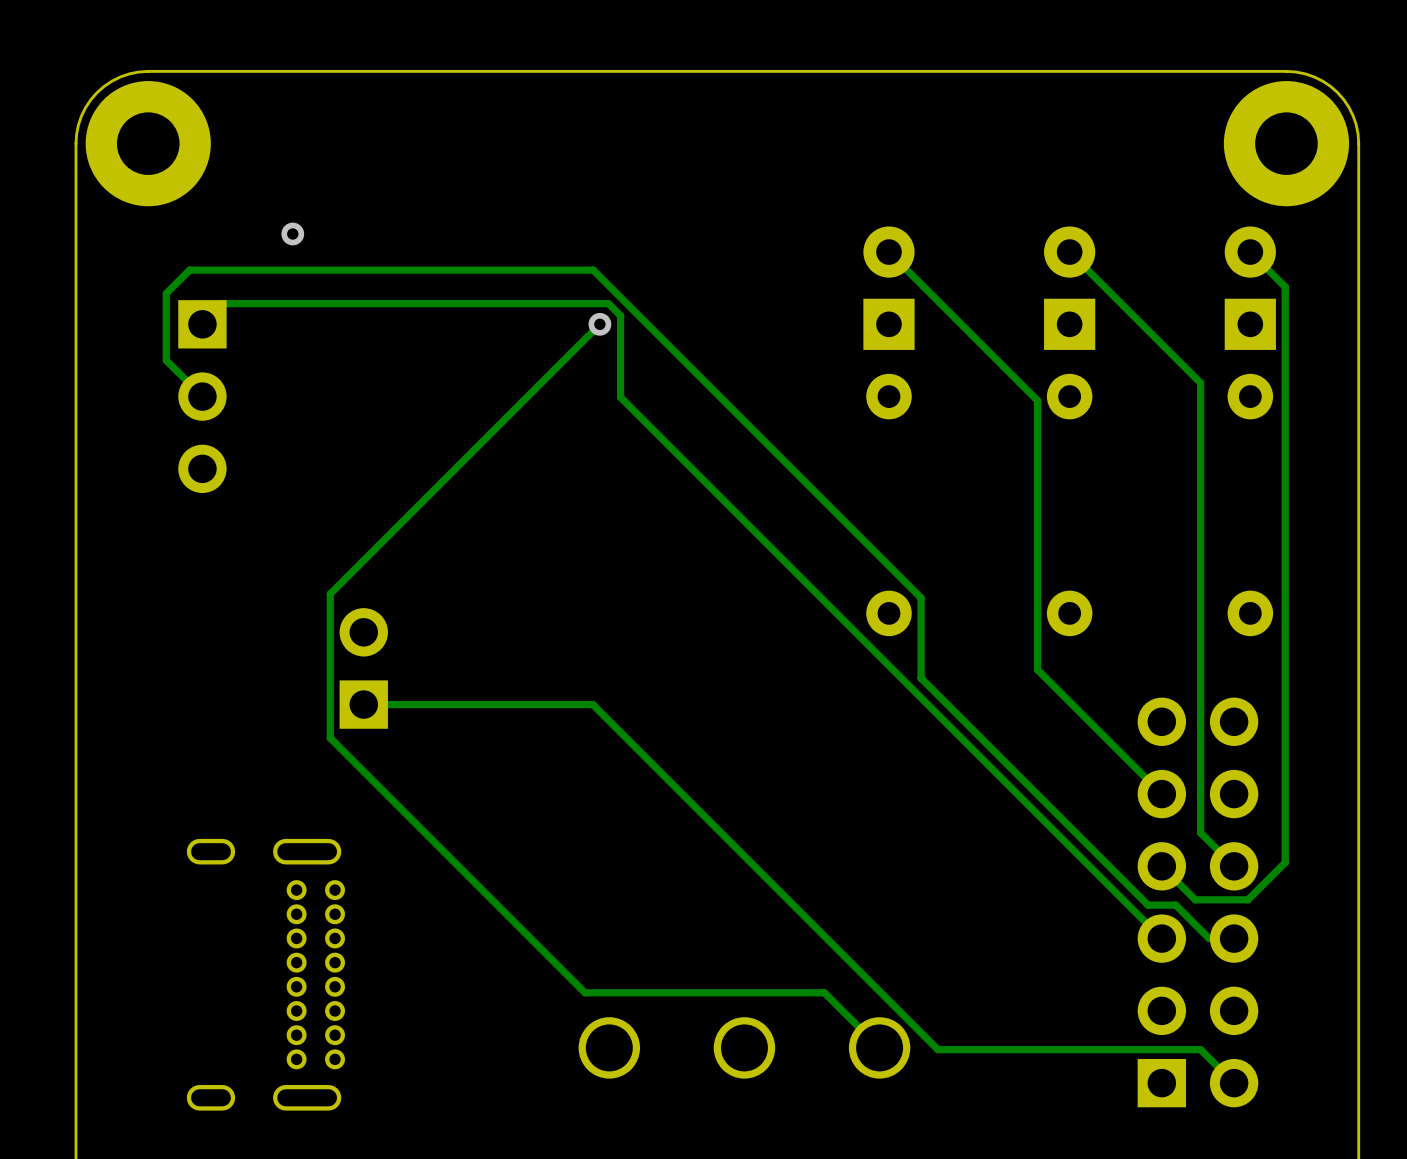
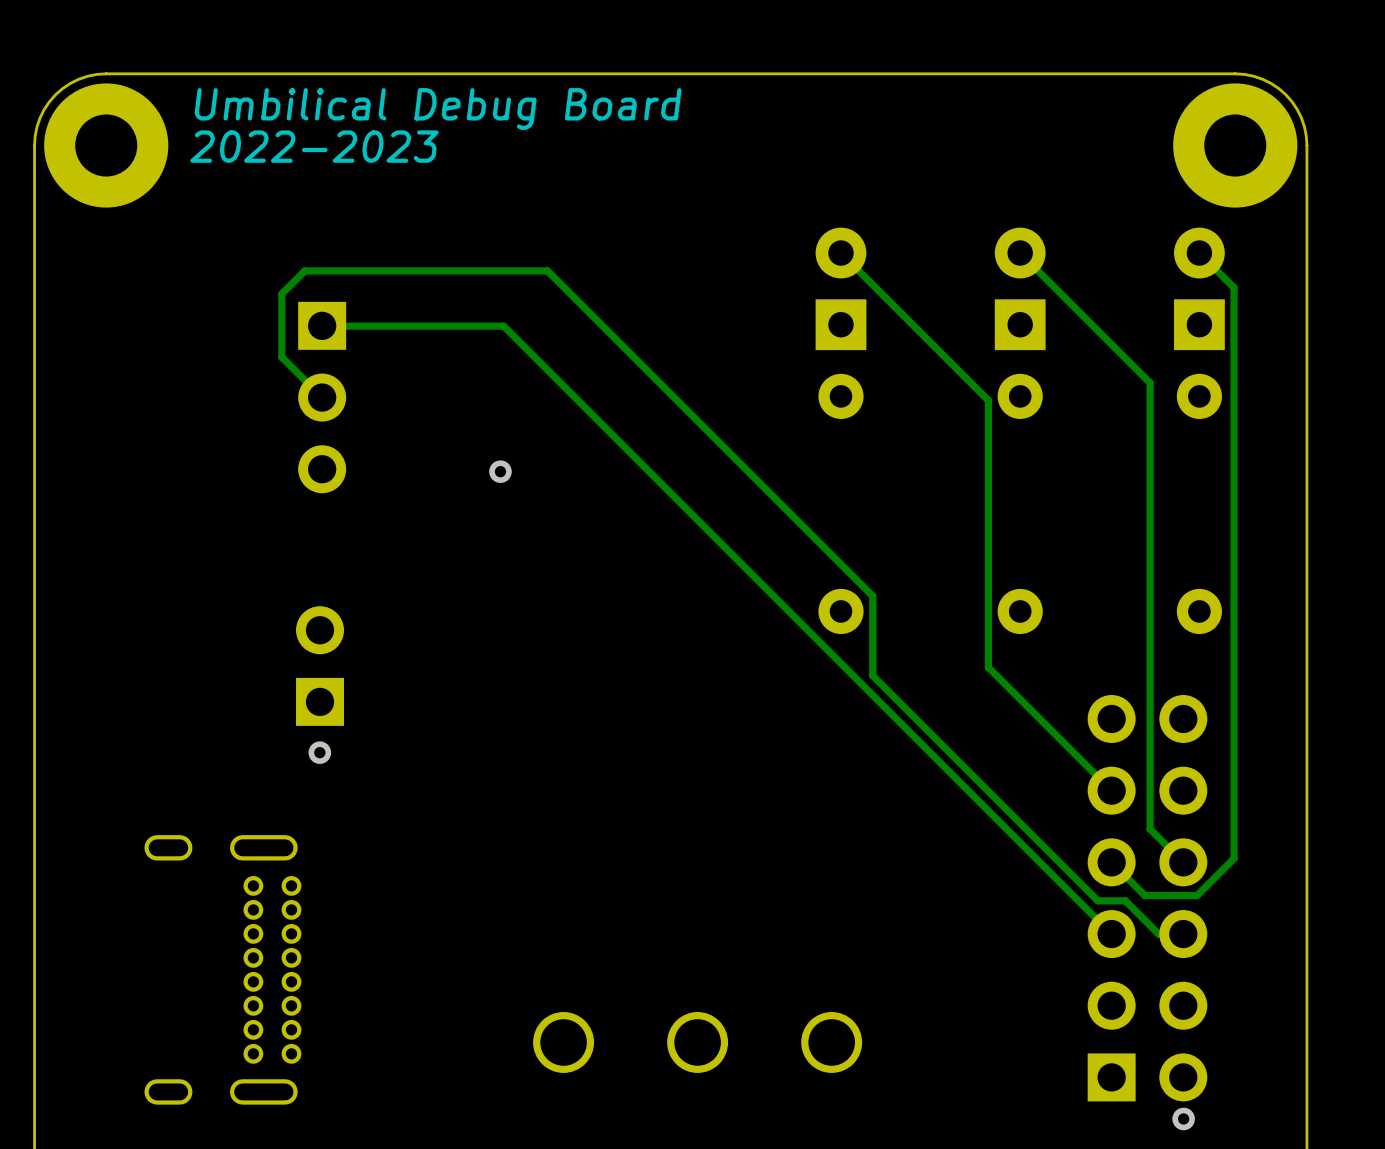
text: none -> Umbilical Debug Board (438, 109)
text: none -> 2022-2023 (314, 146)
via: (292, 233) -> none
track: (348, 270) (189, 270) (166, 293) (166, 360) (202, 396) -> (304, 270) (281, 293) (281, 357) (322, 397)
track: (202, 324) (223, 303) (608, 303) (620, 315) (620, 397) -> (322, 326) (503, 326) (574, 397)
track: (599, 324) (330, 593) (330, 738) (585, 992) (824, 992) (879, 1047) -> none
via position: (599, 324) -> (500, 471)
part position: (202, 396) -> (322, 397)
track: (363, 704) (592, 704) (937, 1049) (1200, 1049) (1234, 1083) -> none
via: none -> (319, 752)
via: none -> (1183, 1118)

